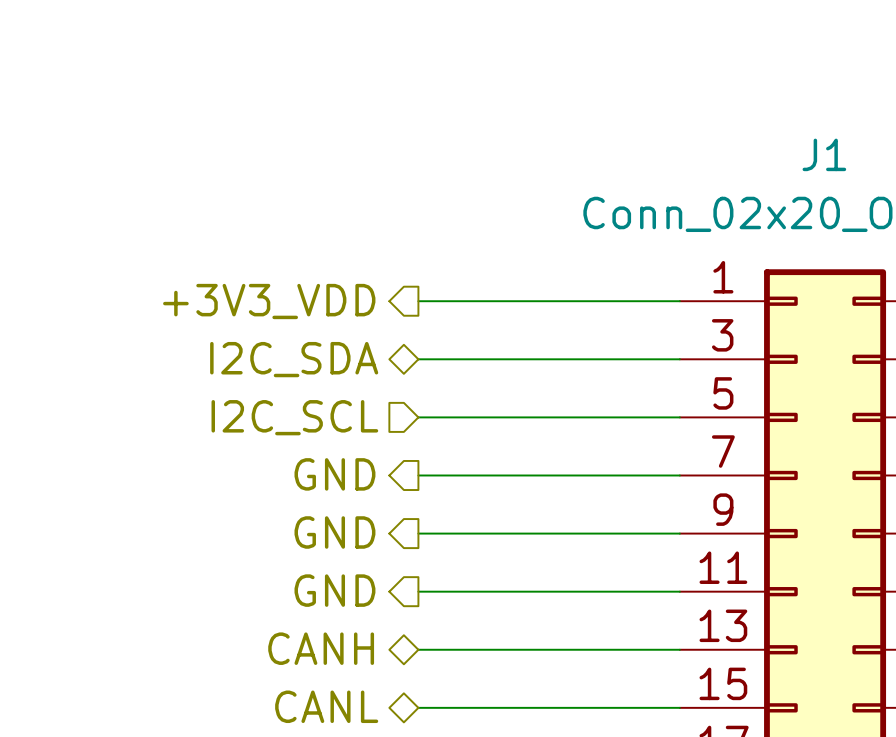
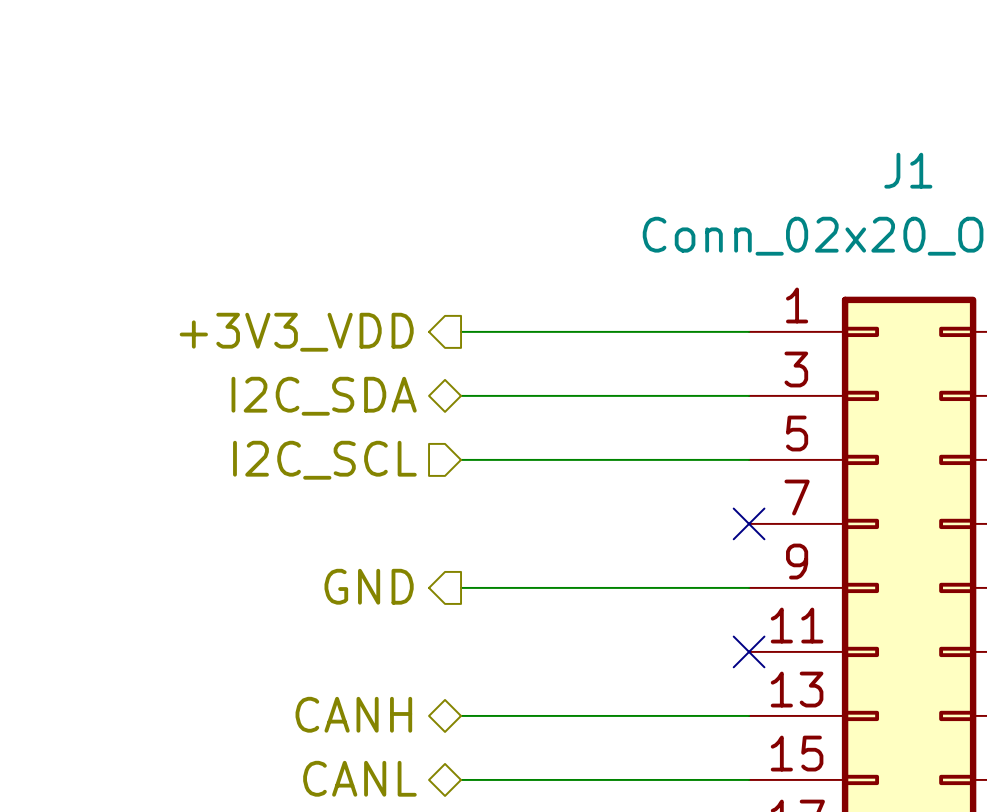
hierarchical label: GND (334, 474) -> none
wire: (418, 475) (679, 475) -> none
no-connect mark: none -> (749, 523)
hierarchical label: GND (334, 590) -> none
wire: (418, 591) (679, 591) -> none
no-connect mark: none -> (749, 651)

